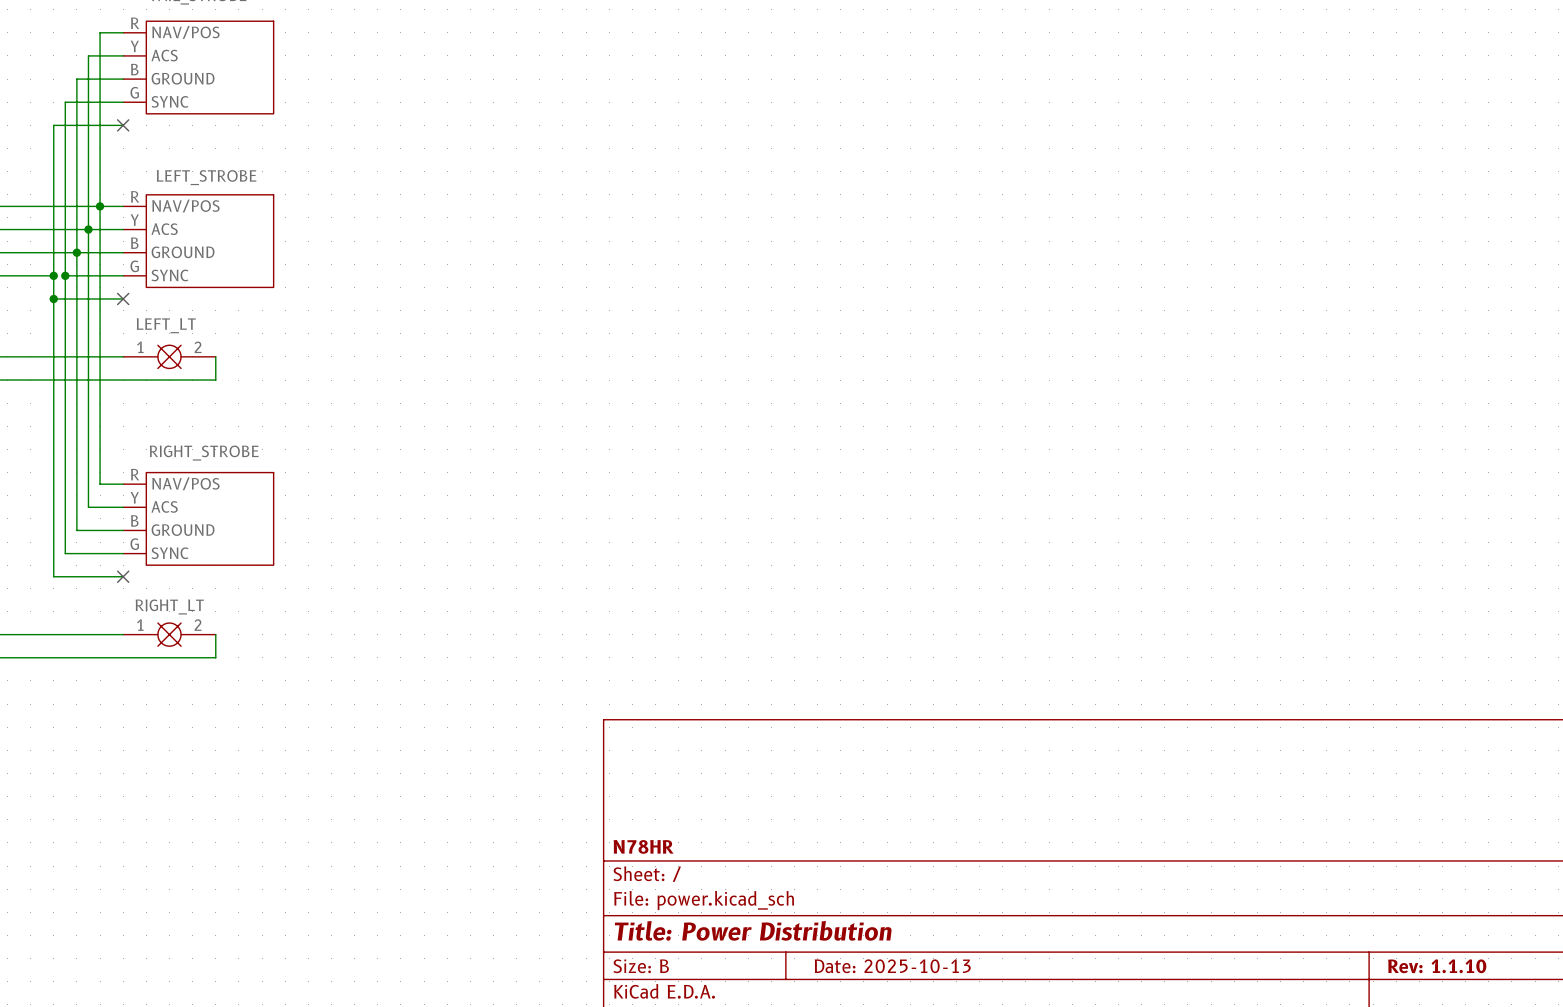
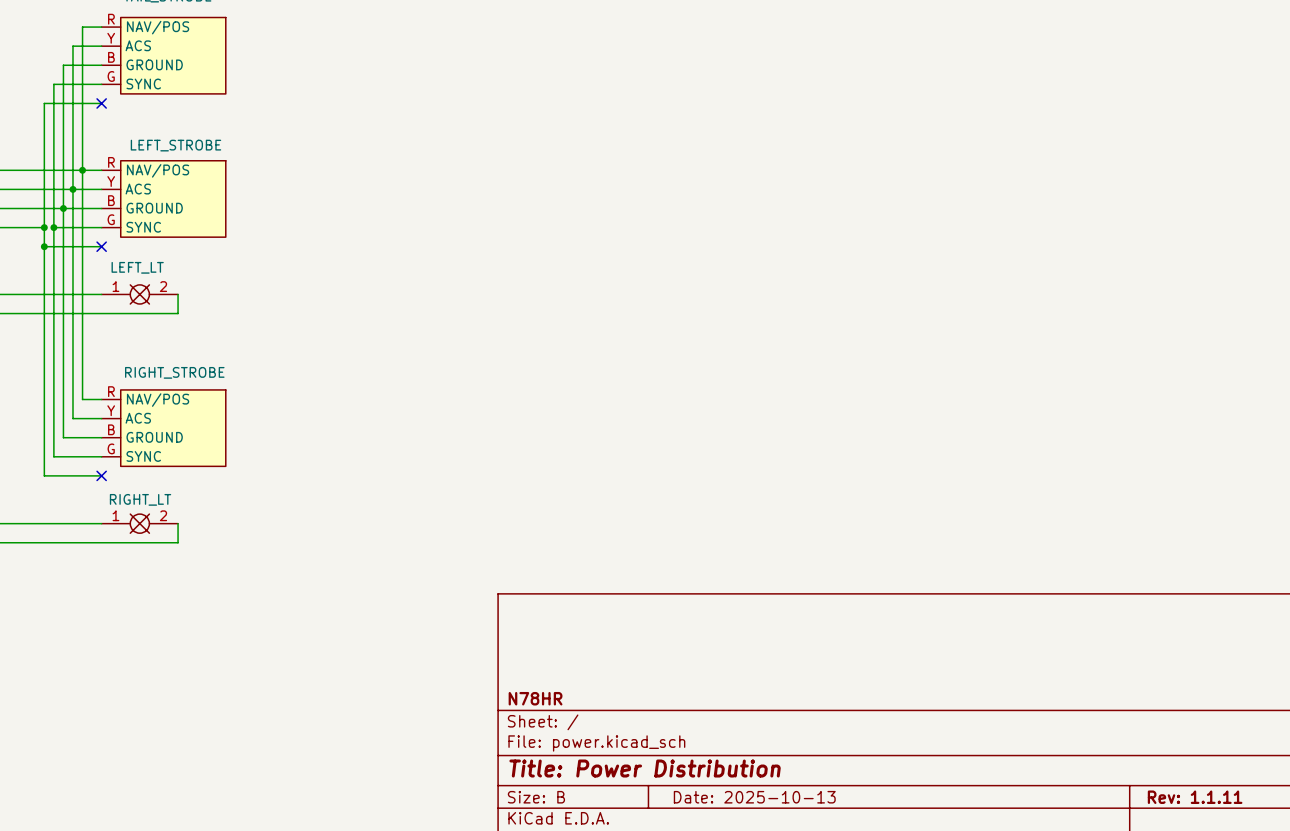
title block: Rev: 1.1.10 (1437, 966) -> Rev: 1.1.11 (1195, 797)

